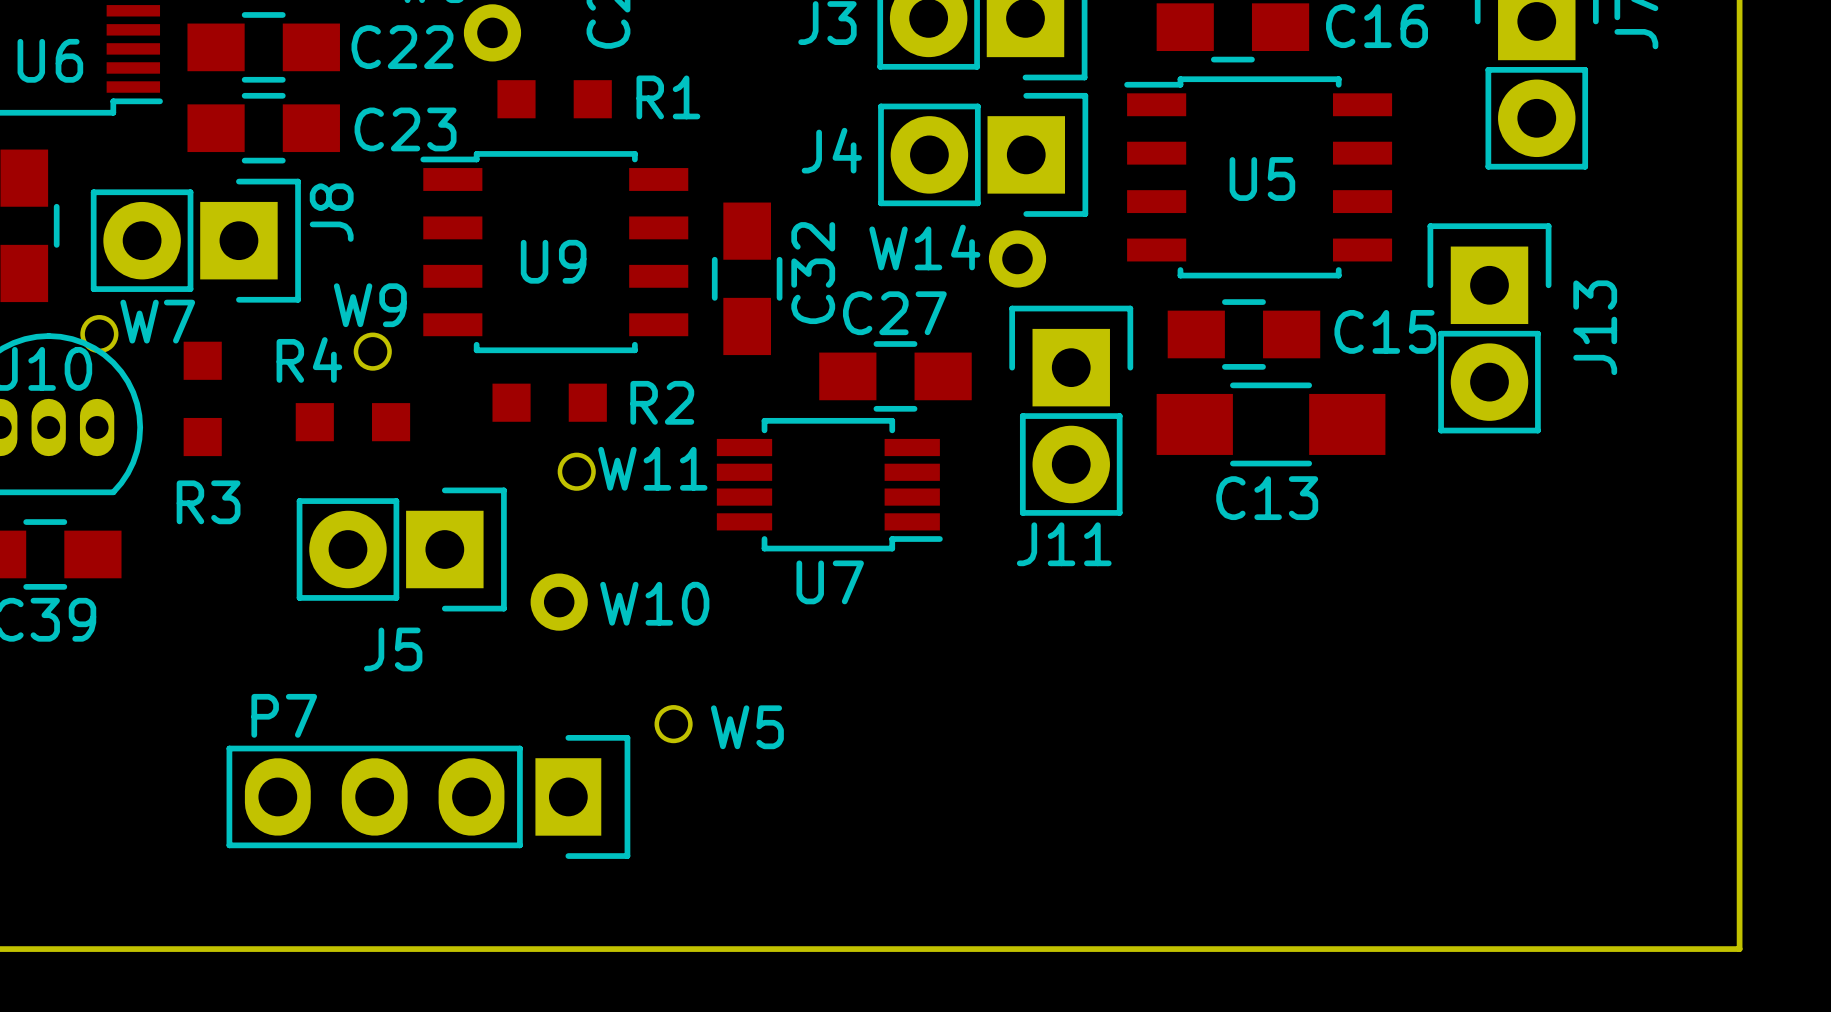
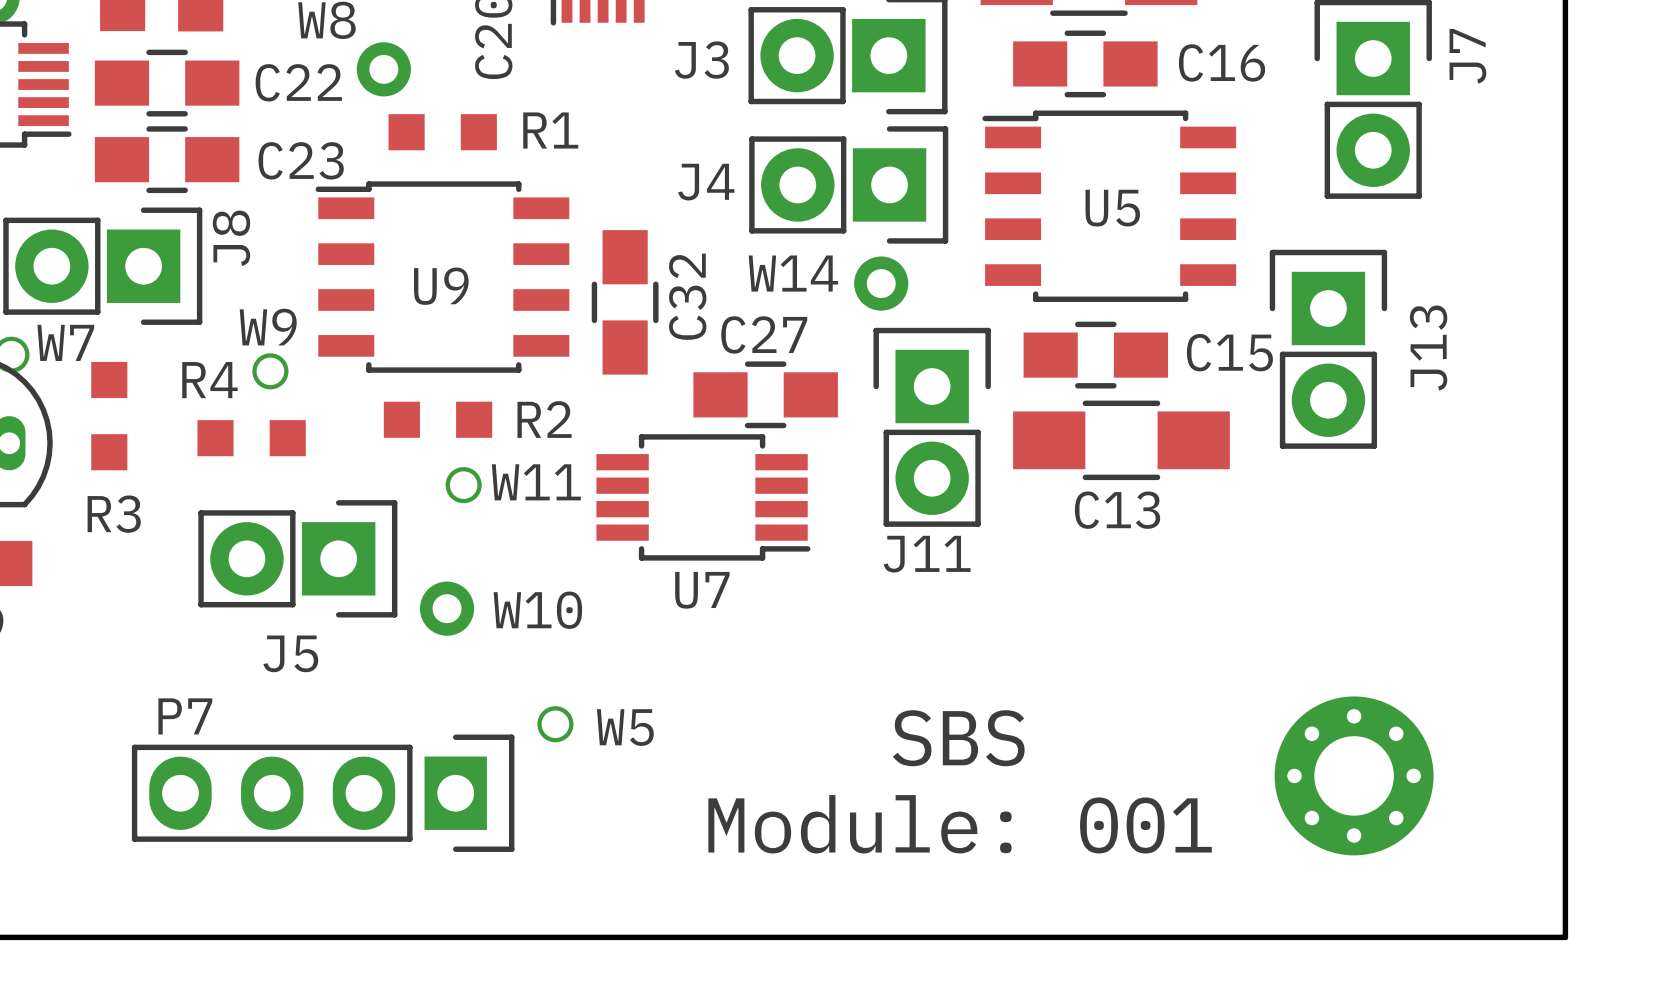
text: none -> SBS (958, 738)
part: none -> (1354, 775)
text: none -> Module: 001 (960, 824)

